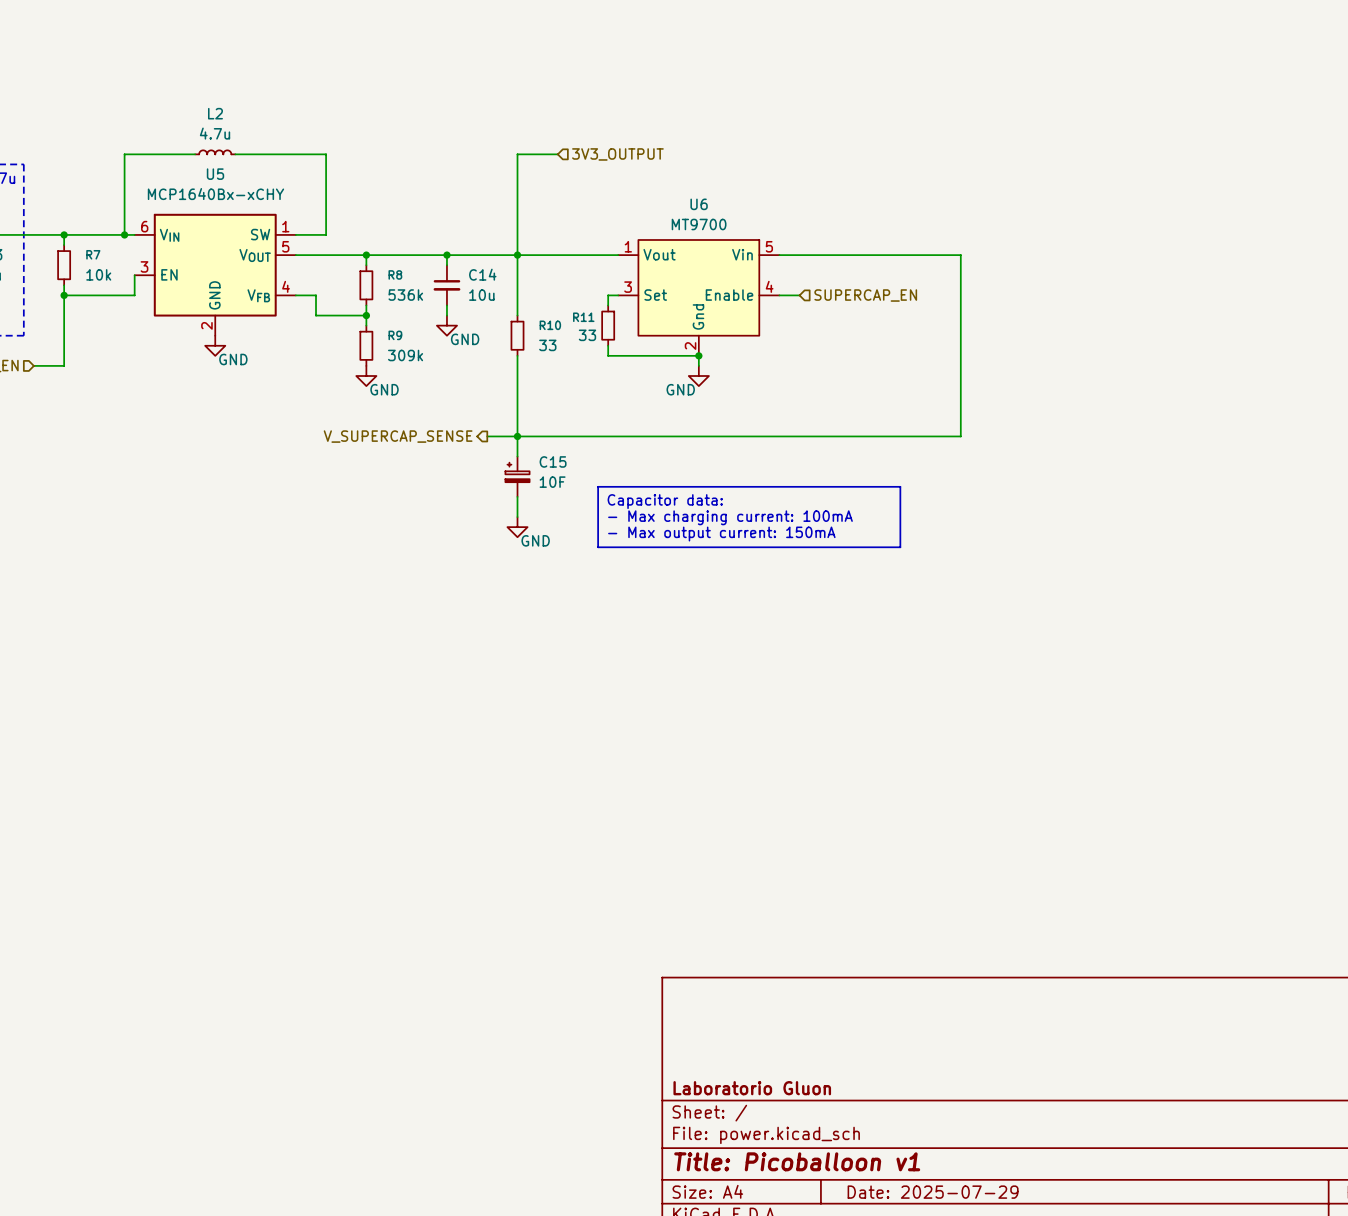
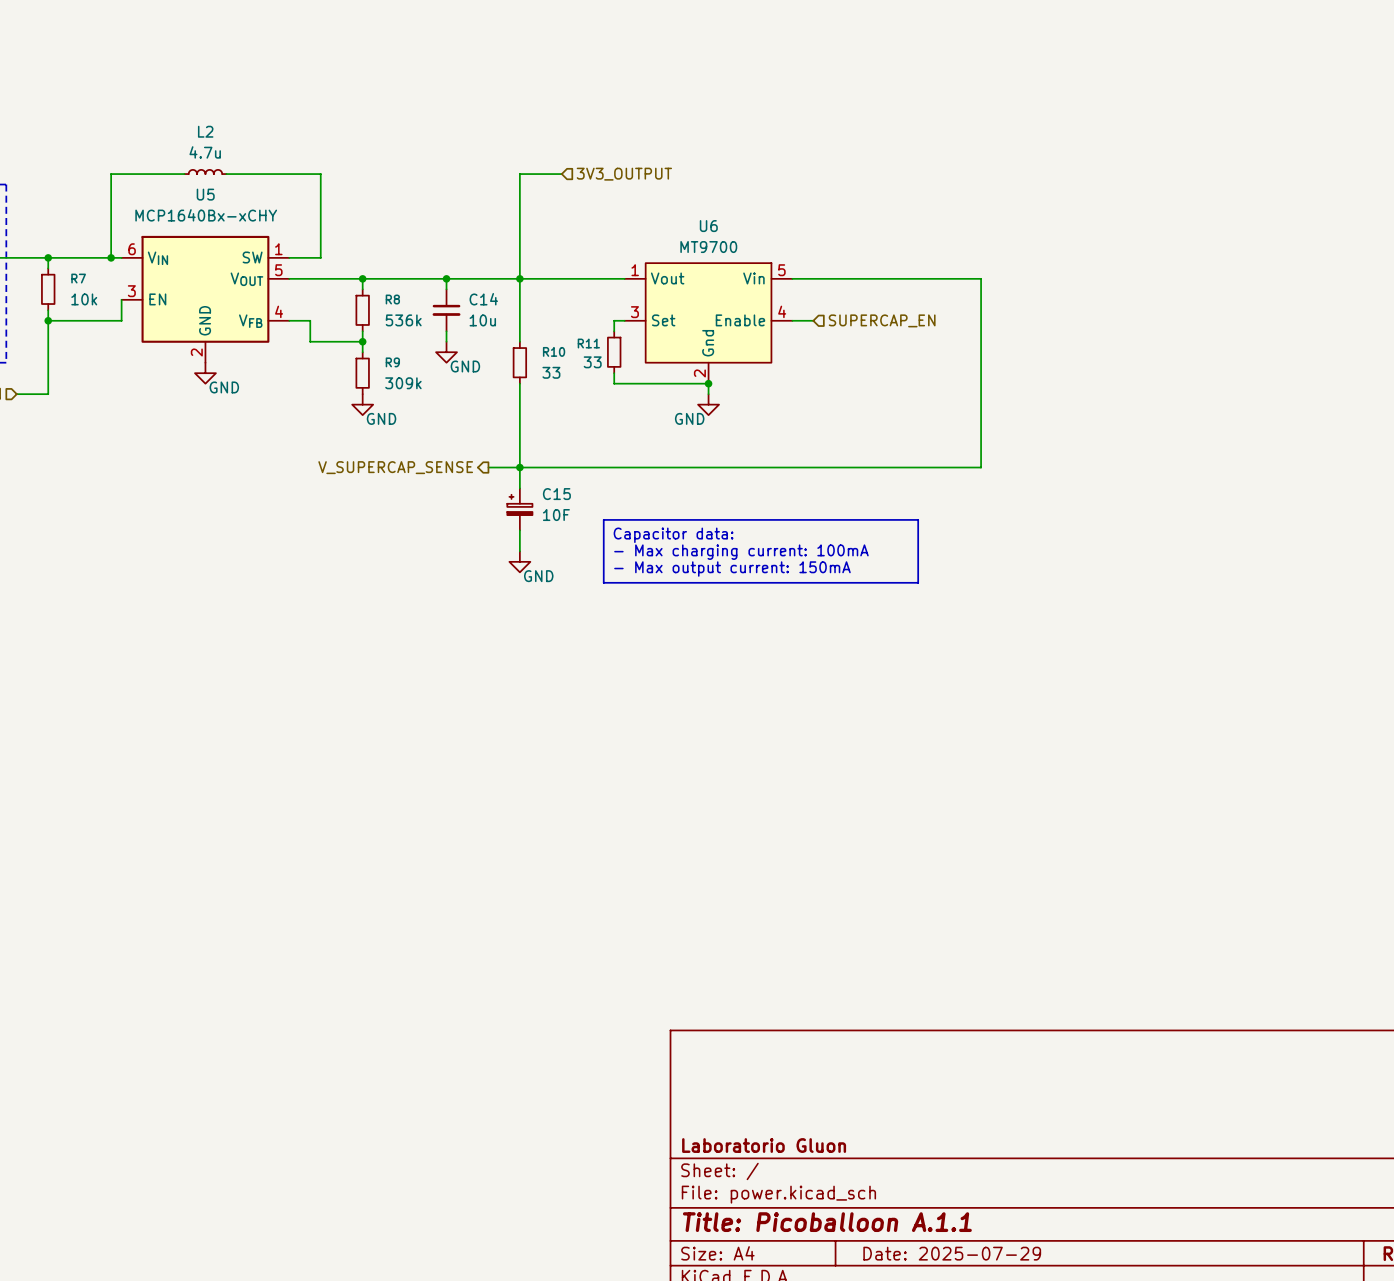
title block: Title: Picoballoon v1 (797, 1161) -> Title: Picoballoon A.1.1 (827, 1222)

